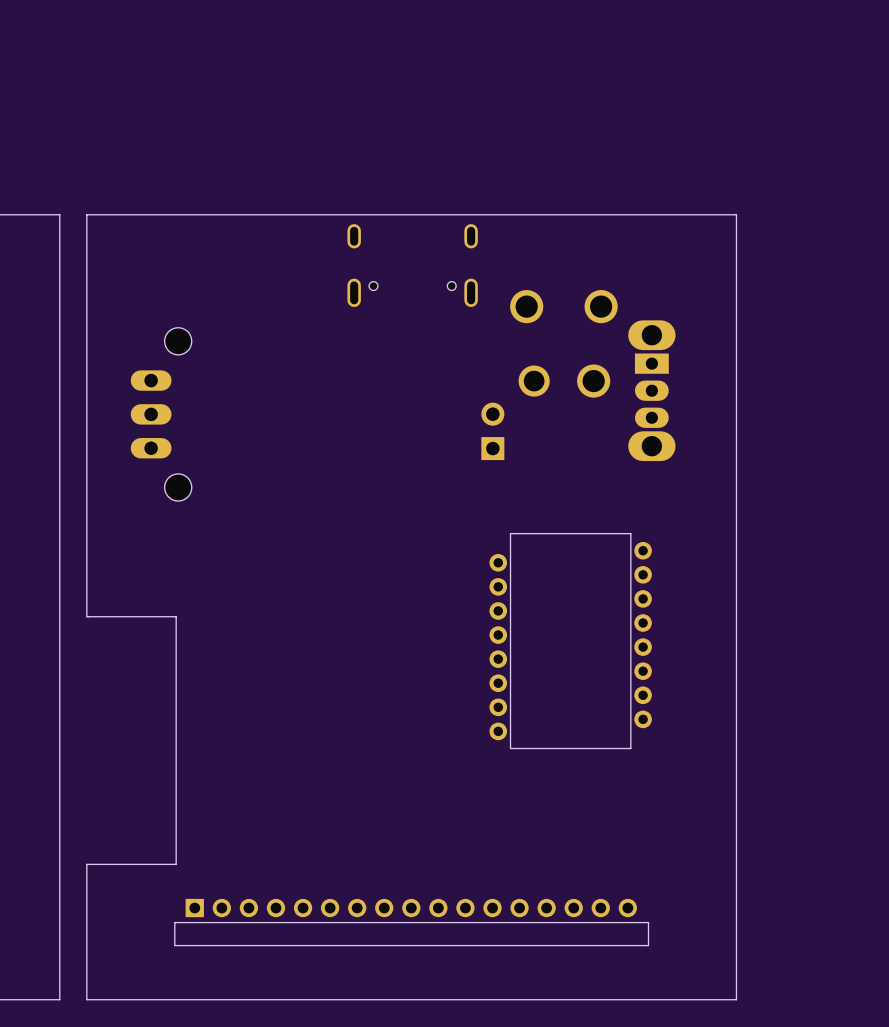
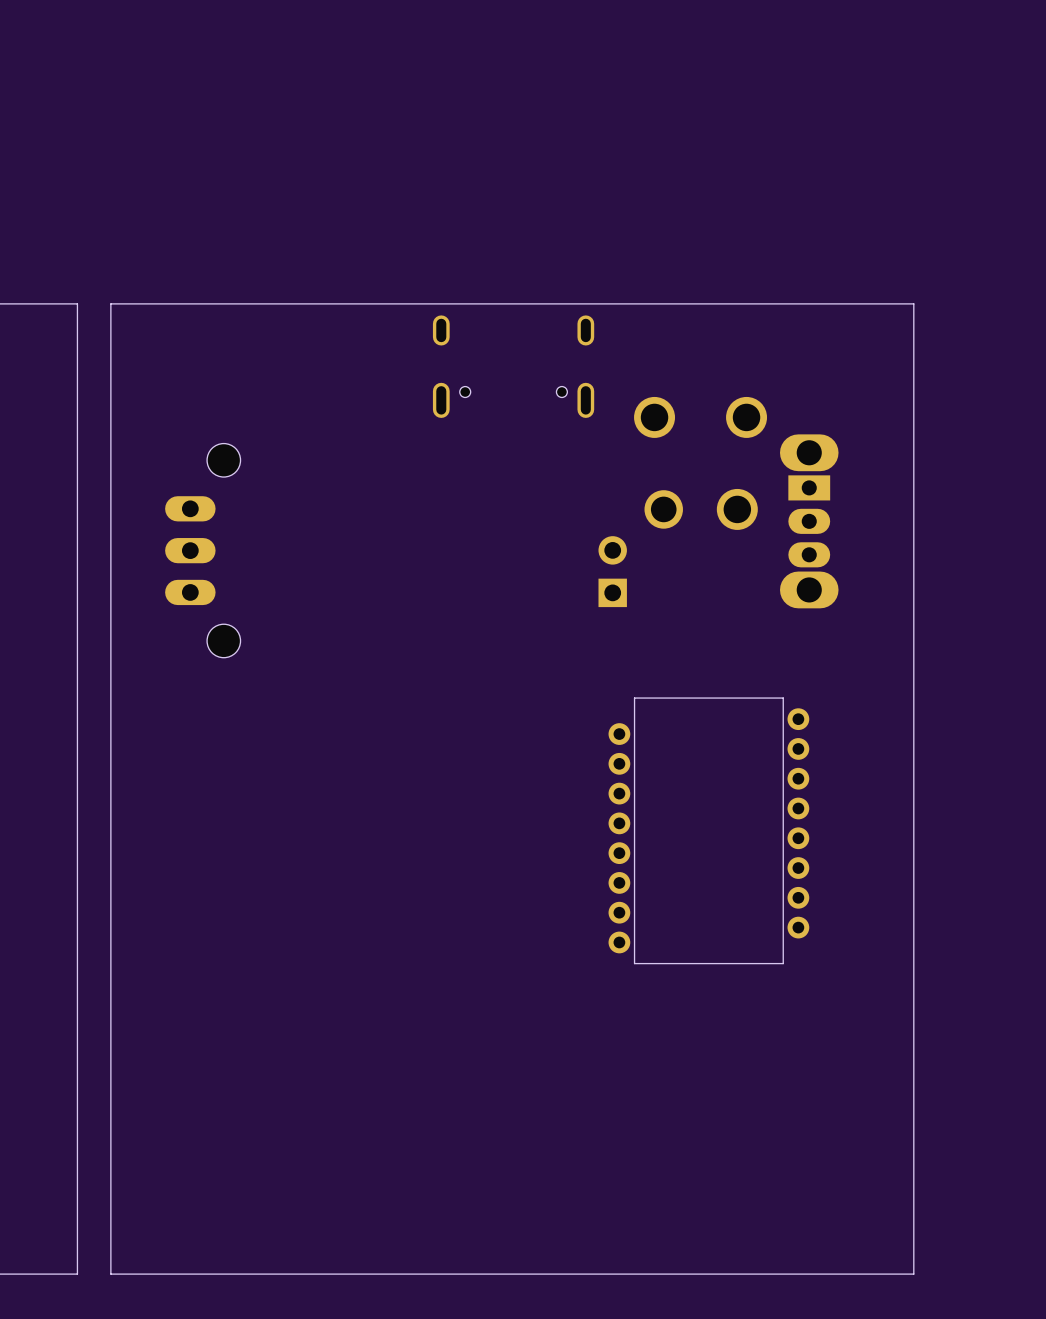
board edge: (86, 616) (176, 616) (176, 864) (86, 864) -> (110, 800) (110, 1106)
part: (411, 908) -> none
board edge: (648, 922) (174, 922) (174, 945) (648, 945) (648, 922) -> none

